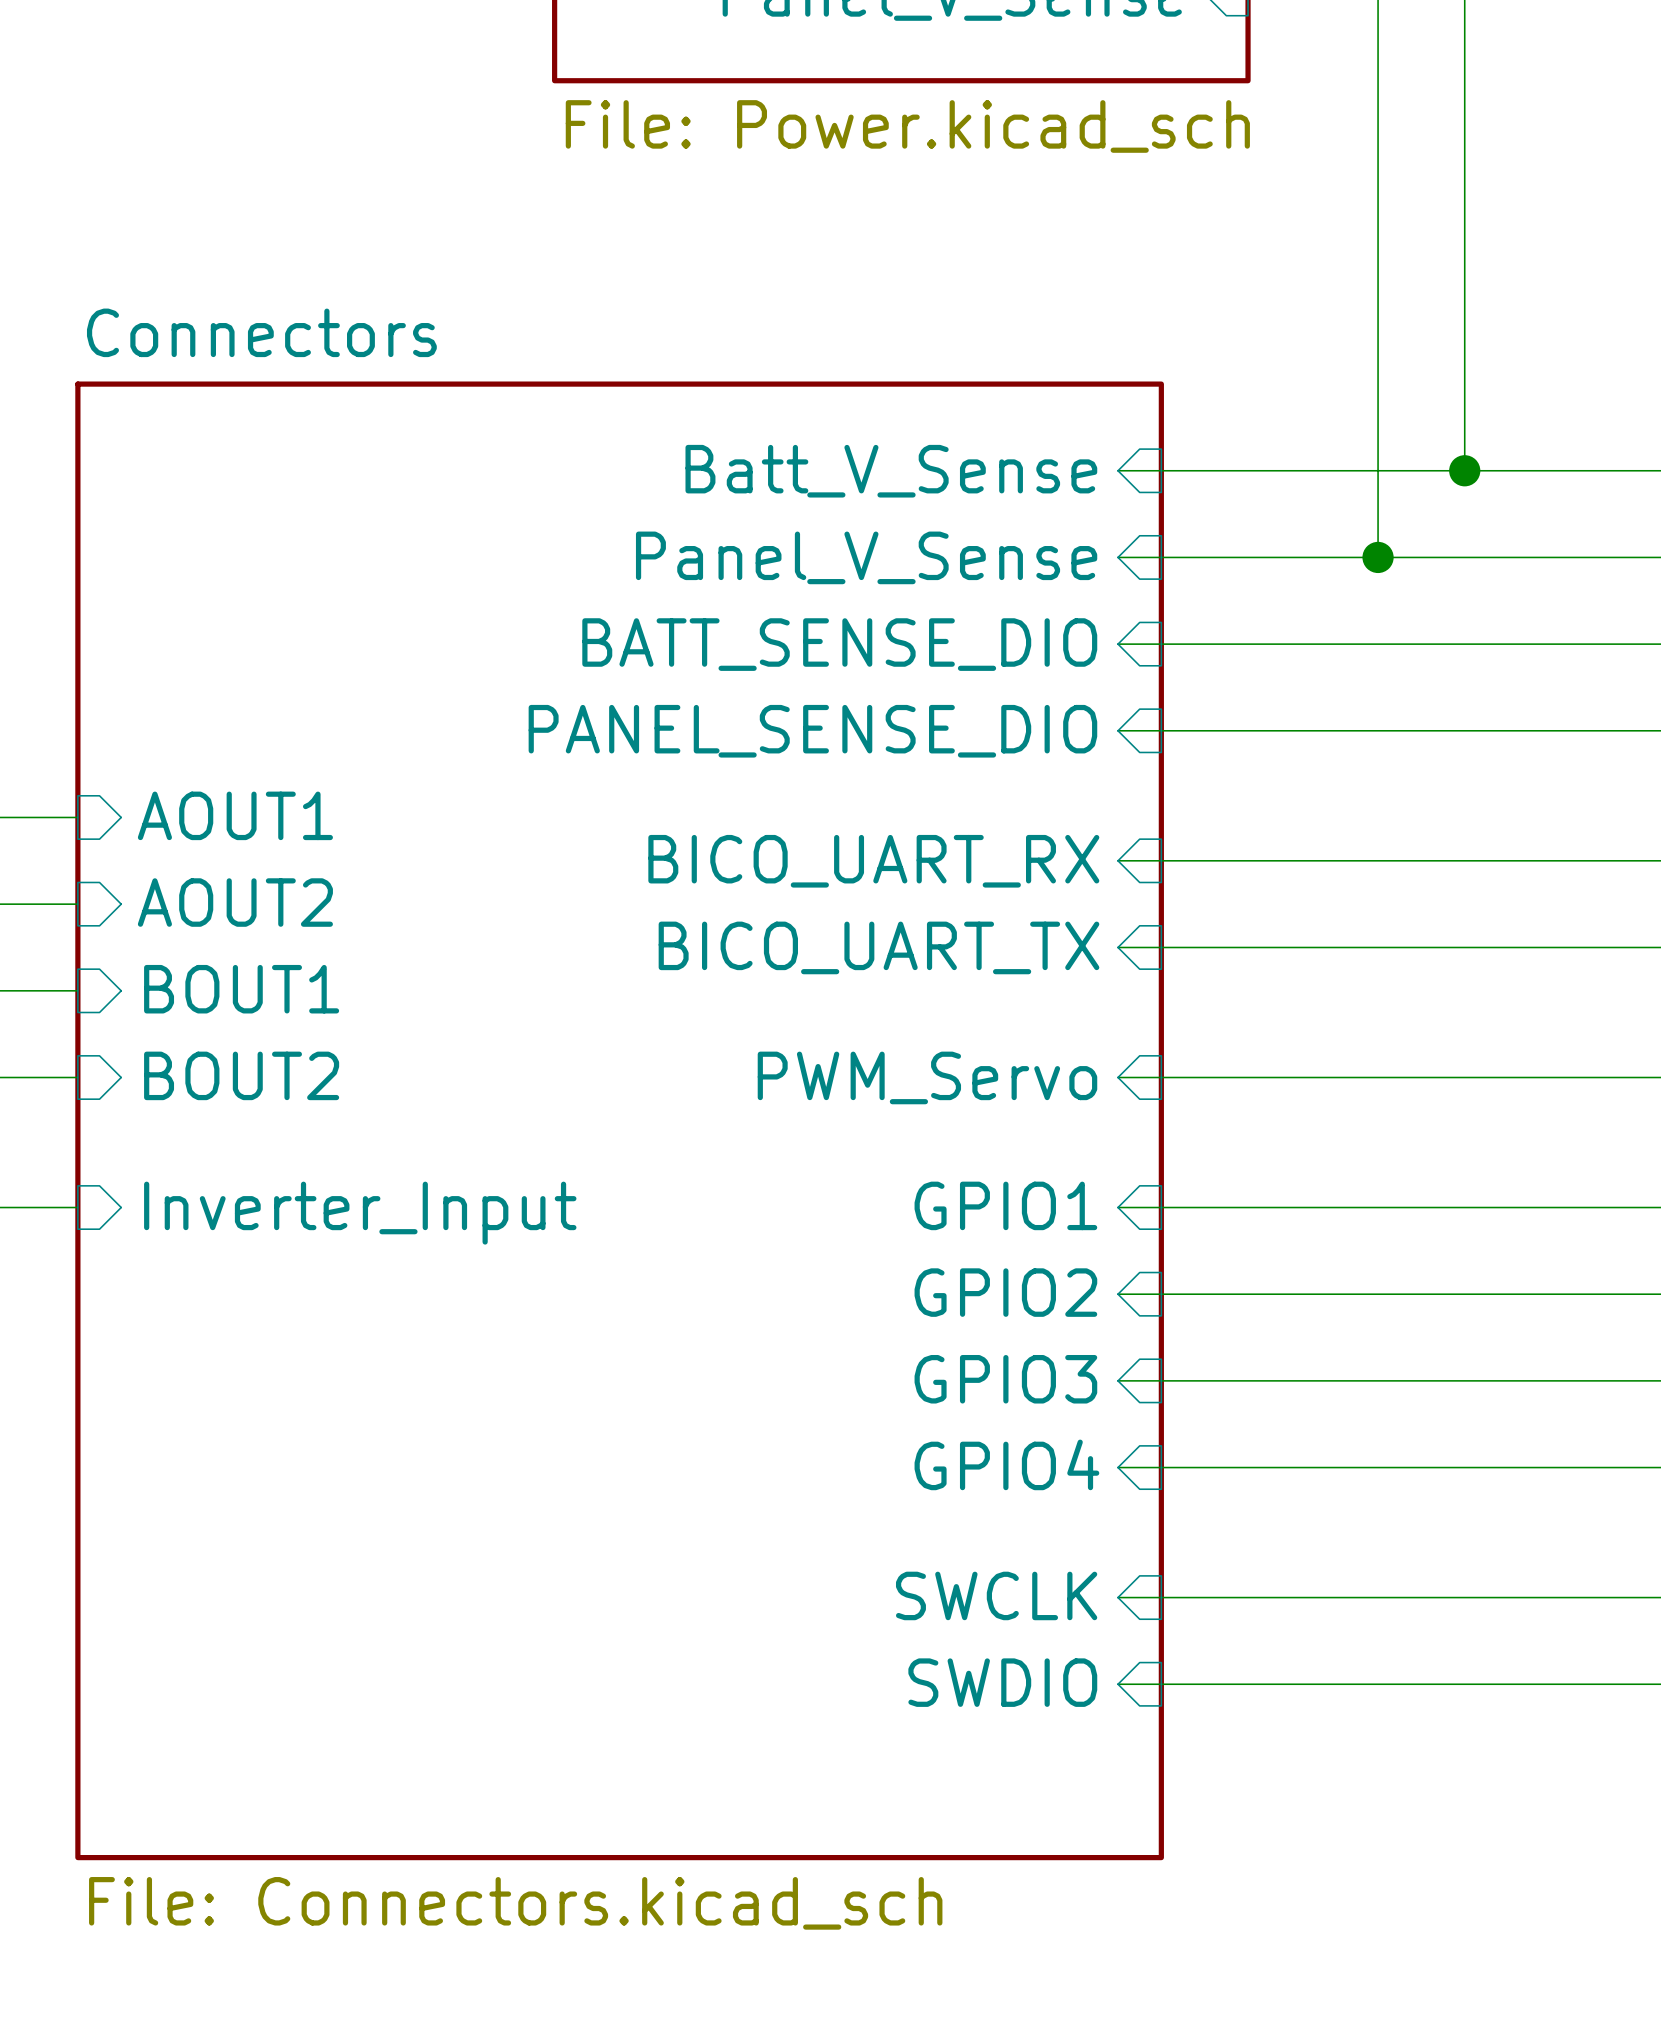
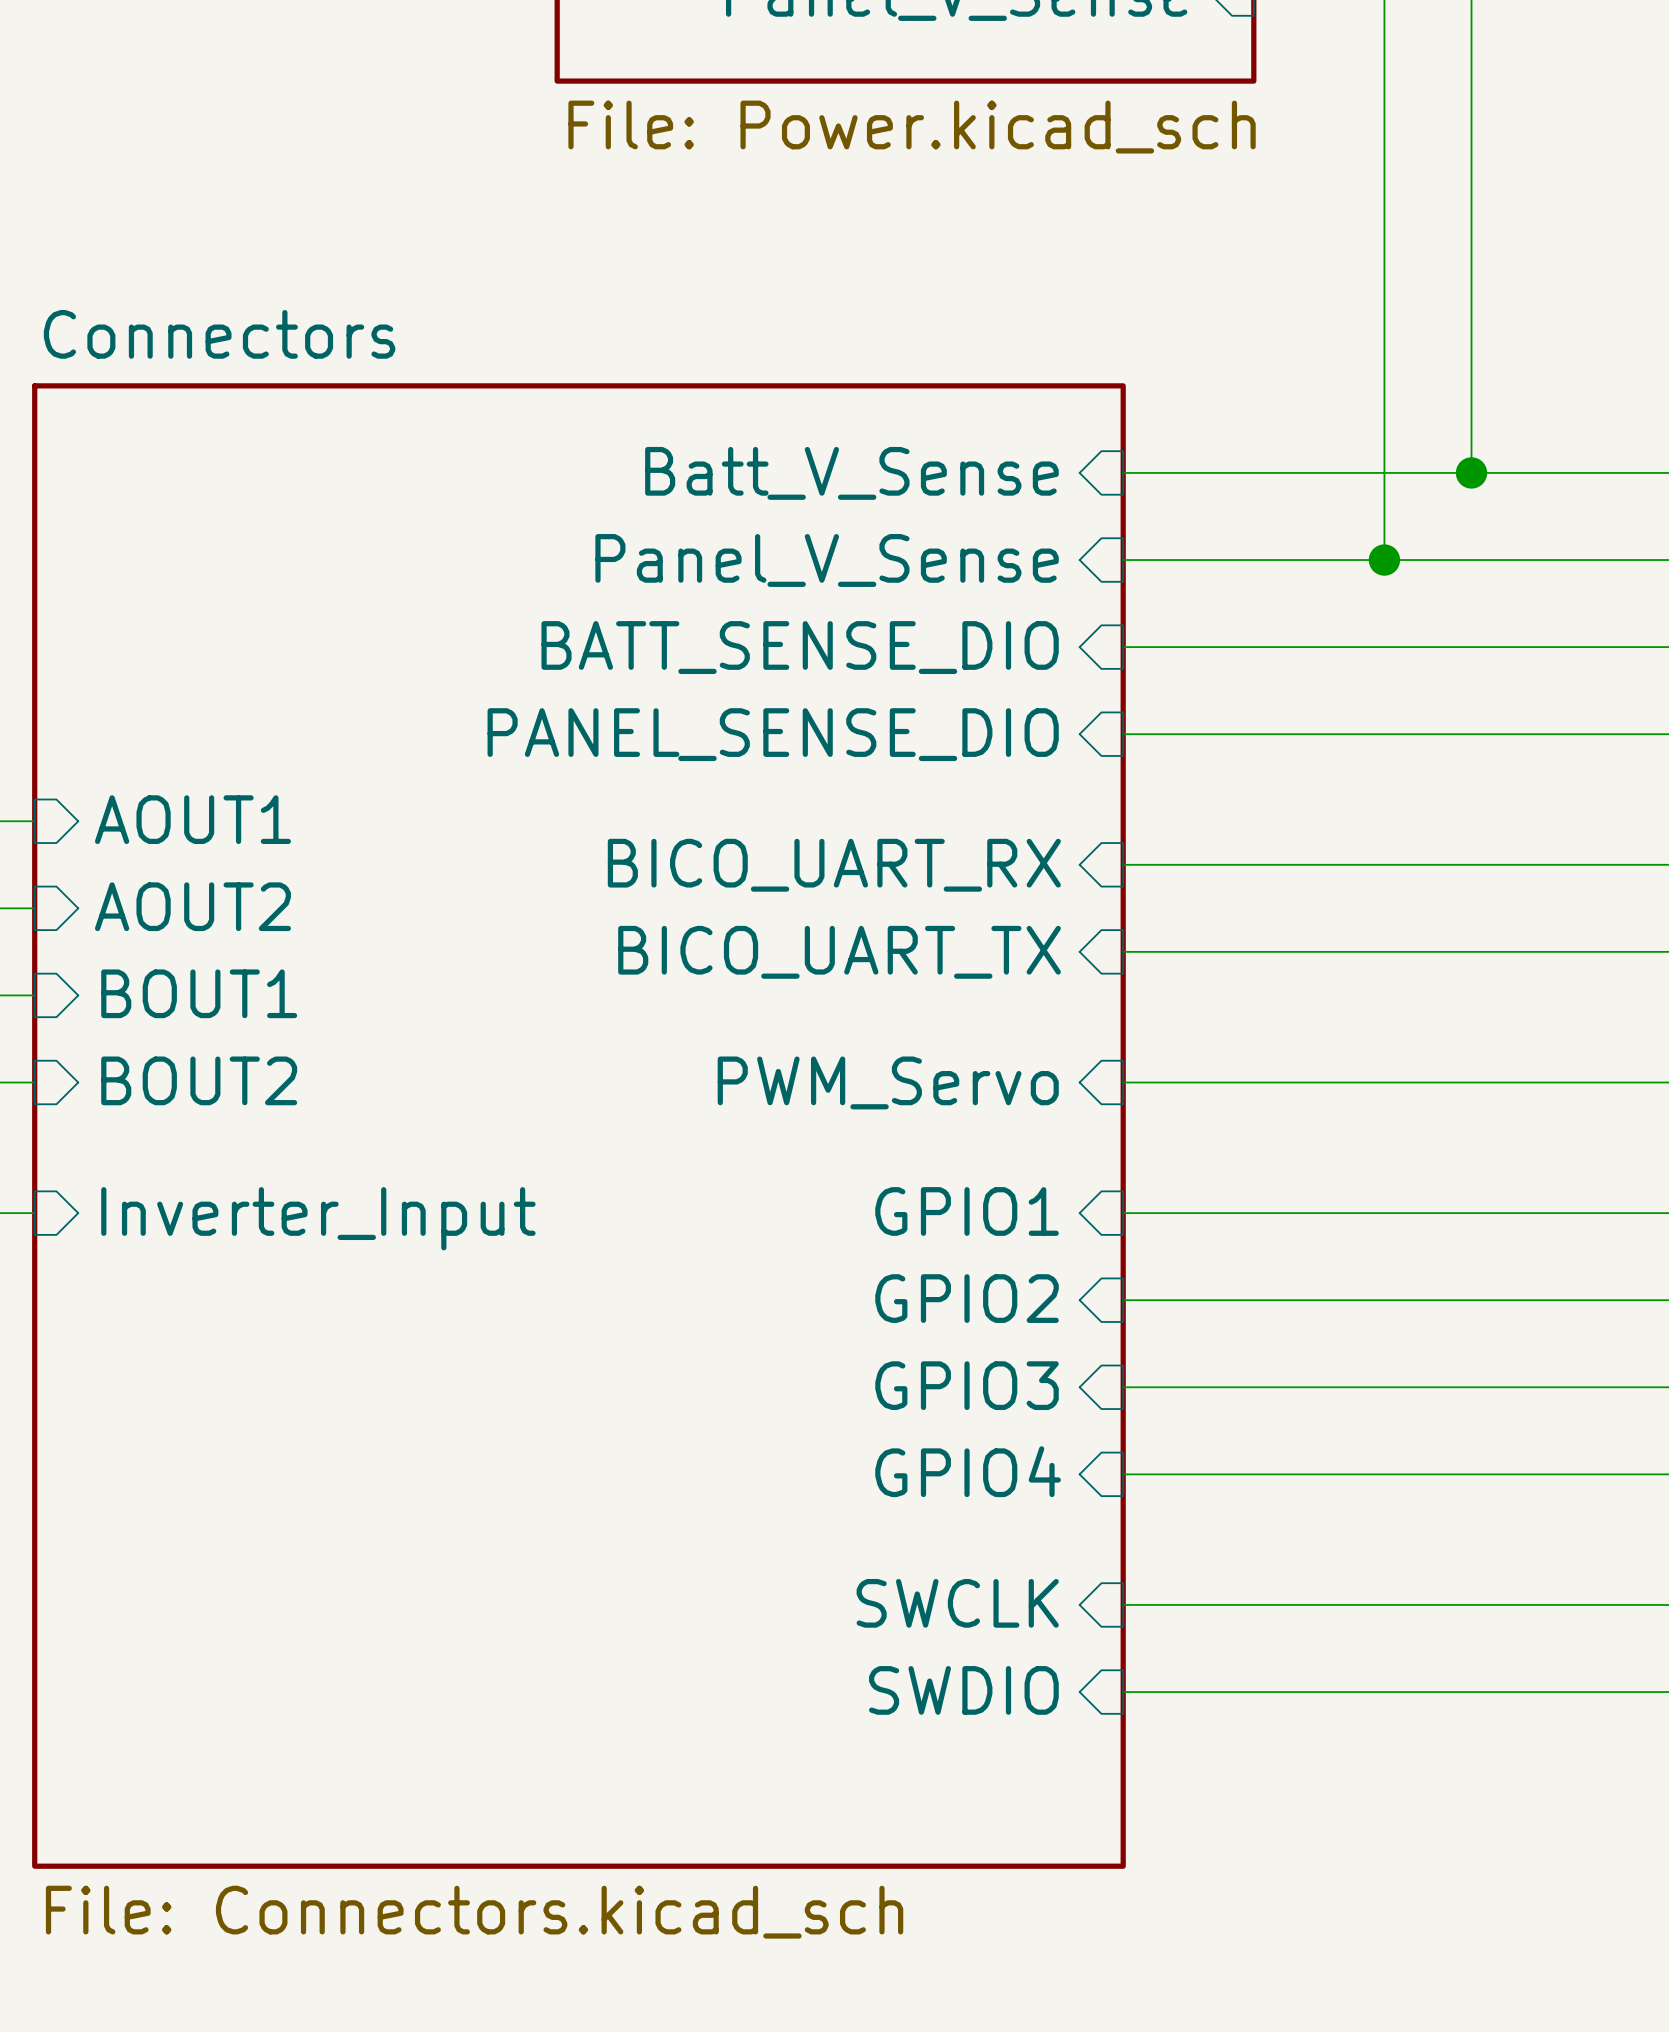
sheet pin position: Batt_V_Sense (891, 471) -> Batt_V_Sense (851, 473)
sheet pin position: Panel_V_Sense (866, 557) -> Panel_V_Sense (827, 560)
sheet pin position: BATT_SENSE_DIO (839, 644) -> BATT_SENSE_DIO (800, 647)
sheet pin position: PANEL_SENSE_DIO (812, 731) -> PANEL_SENSE_DIO (773, 734)
sheet pin position: AOUT1 (235, 815) -> AOUT1 (192, 819)
wire: (34, 817) (77, 817) -> none
sheet pin position: BICO_UART_RX (873, 861) -> BICO_UART_RX (834, 865)
sheet pin position: AOUT2 (235, 902) -> AOUT2 (192, 906)
wire: (34, 904) (77, 904) -> none
sheet pin position: BICO_UART_TX (878, 947) -> BICO_UART_TX (839, 952)
sheet pin position: BOUT1 (241, 989) -> BOUT1 (199, 993)
wire: (34, 990) (77, 990) -> none
sheet pin position: BOUT2 (241, 1075) -> BOUT2 (199, 1080)
wire: (34, 1077) (77, 1077) -> none
sheet pin position: PWM_Servo (927, 1077) -> PWM_Servo (888, 1082)
sheet Connectors position: (619, 1120) -> (578, 1126)
sheet pin position: GPIO1 (1005, 1205) -> GPIO1 (967, 1211)
wire: (34, 1207) (77, 1207) -> none
sheet pin position: Inverter_Input (360, 1213) -> Inverter_Input (318, 1218)
sheet pin position: GPIO2 (1005, 1292) -> GPIO2 (967, 1298)
sheet pin position: GPIO3 (1005, 1379) -> GPIO3 (967, 1385)
sheet pin position: GPIO4 (1006, 1464) -> GPIO4 (968, 1471)
sheet pin position: SWCLK (996, 1595) -> SWCLK (957, 1603)
sheet pin position: SWDIO (1002, 1682) -> SWDIO (963, 1690)

